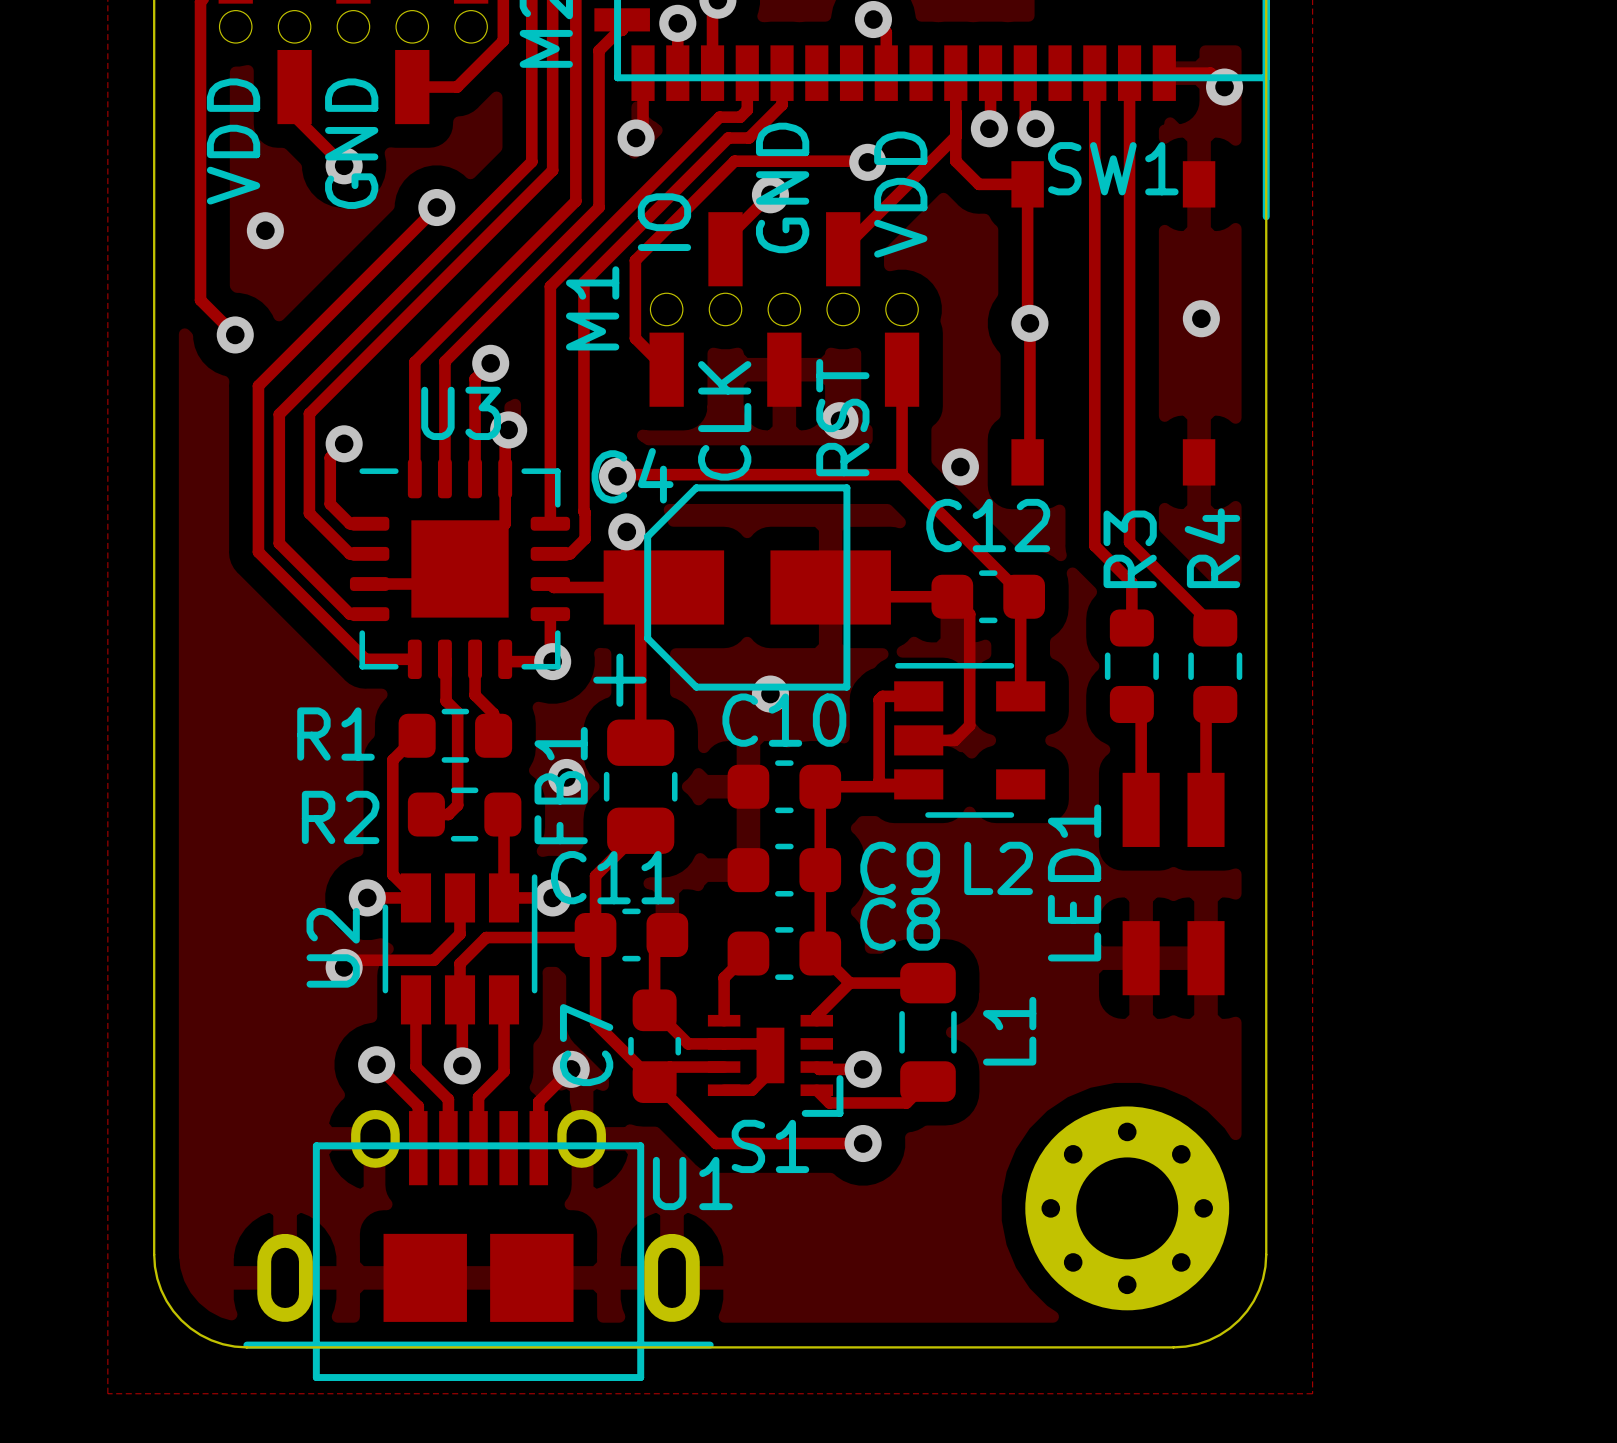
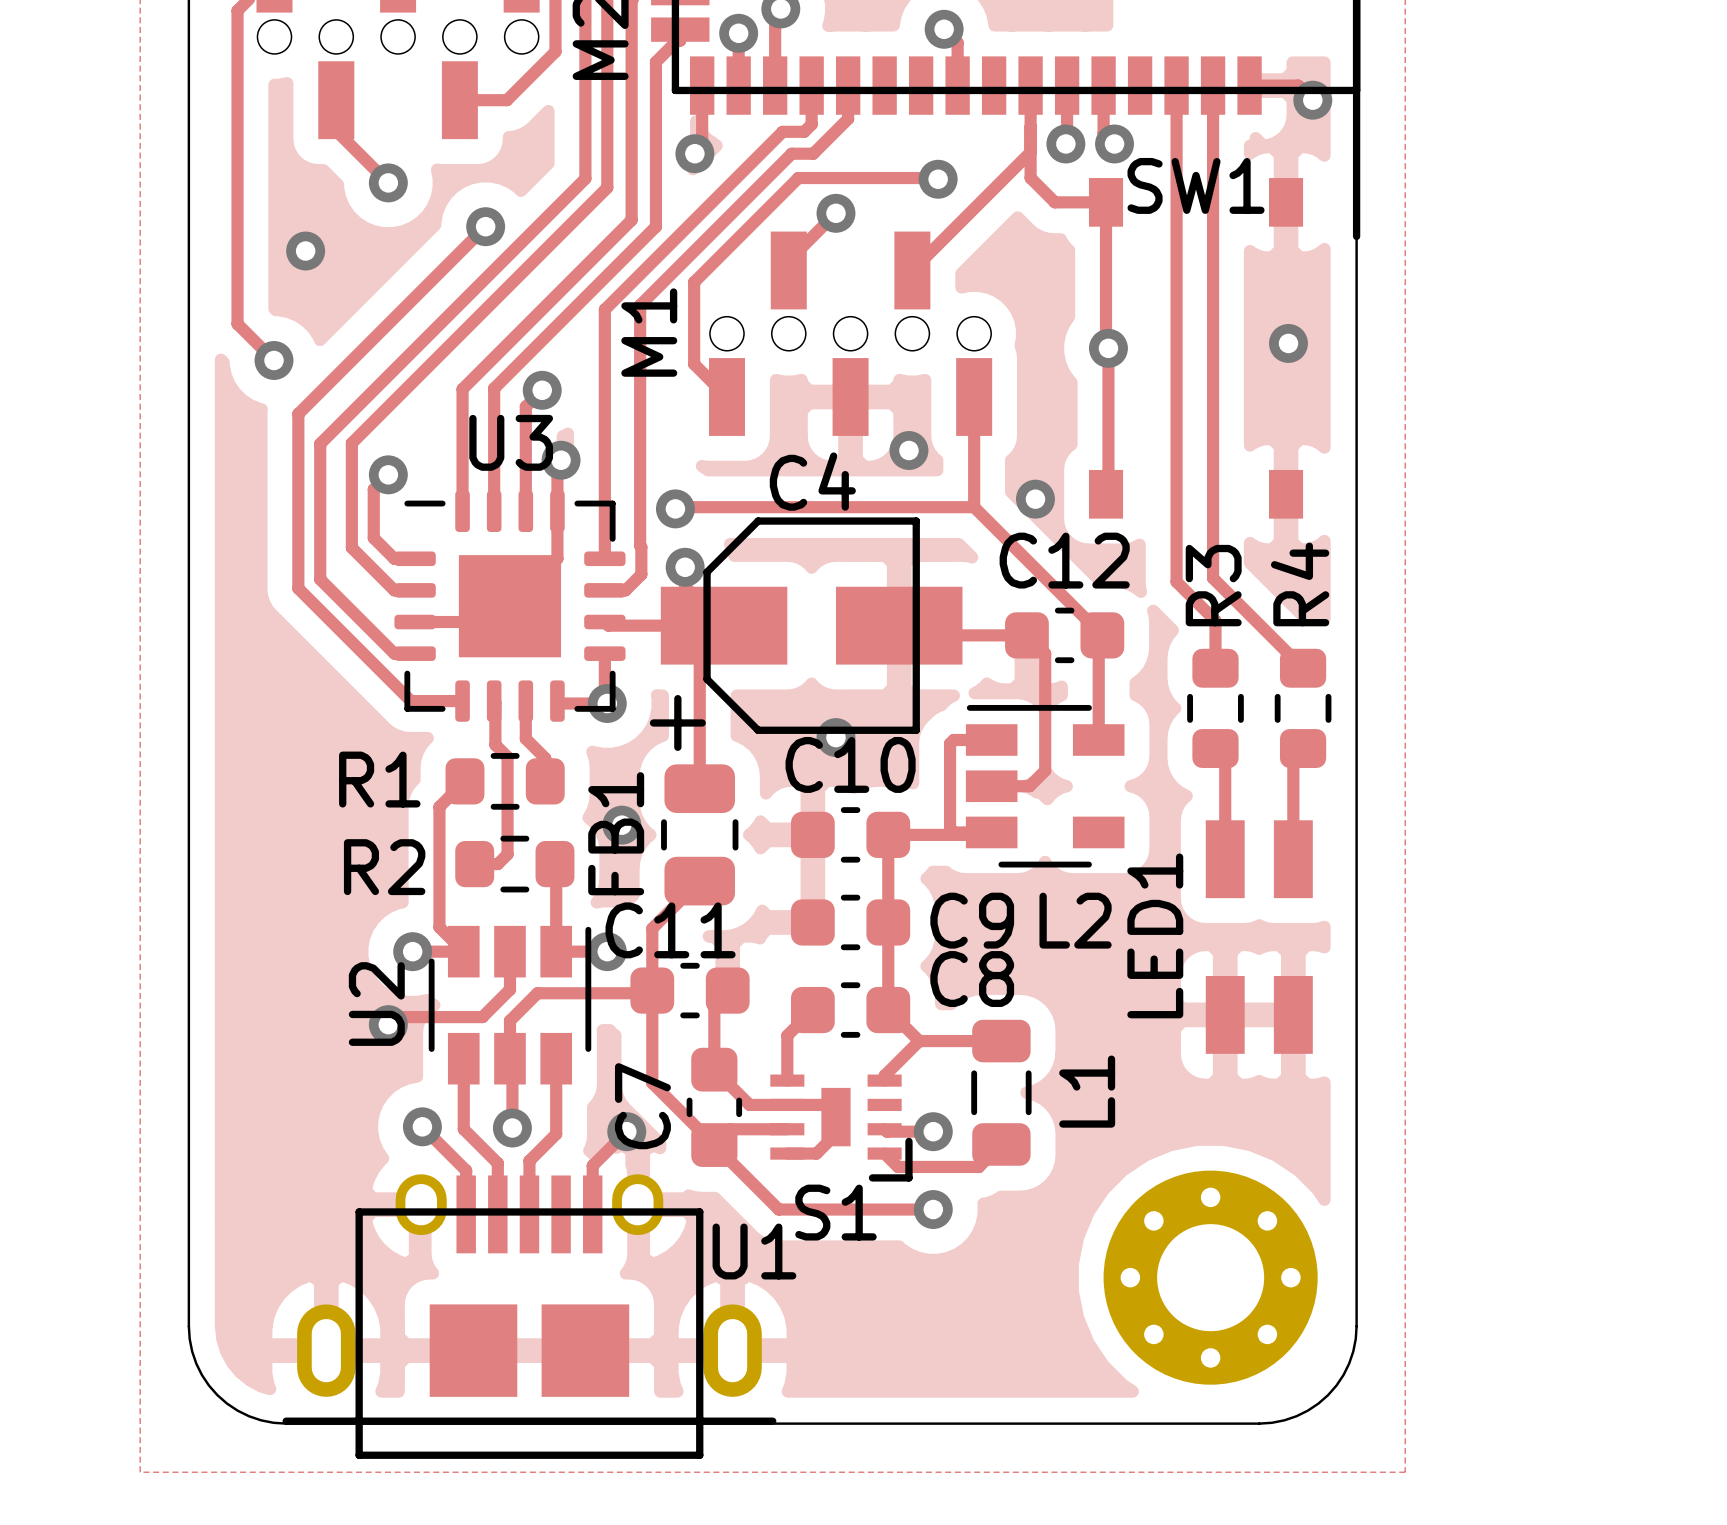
text: VDD (233, 141) -> none
text: GND (351, 143) -> none
text: GND (782, 187) -> none
text: VDD (900, 194) -> none
text: IO (664, 222) -> none
text: RST (842, 417) -> none
text: CLK (724, 420) -> none
C4 name position: C4 (632, 475) -> C4 (812, 481)

